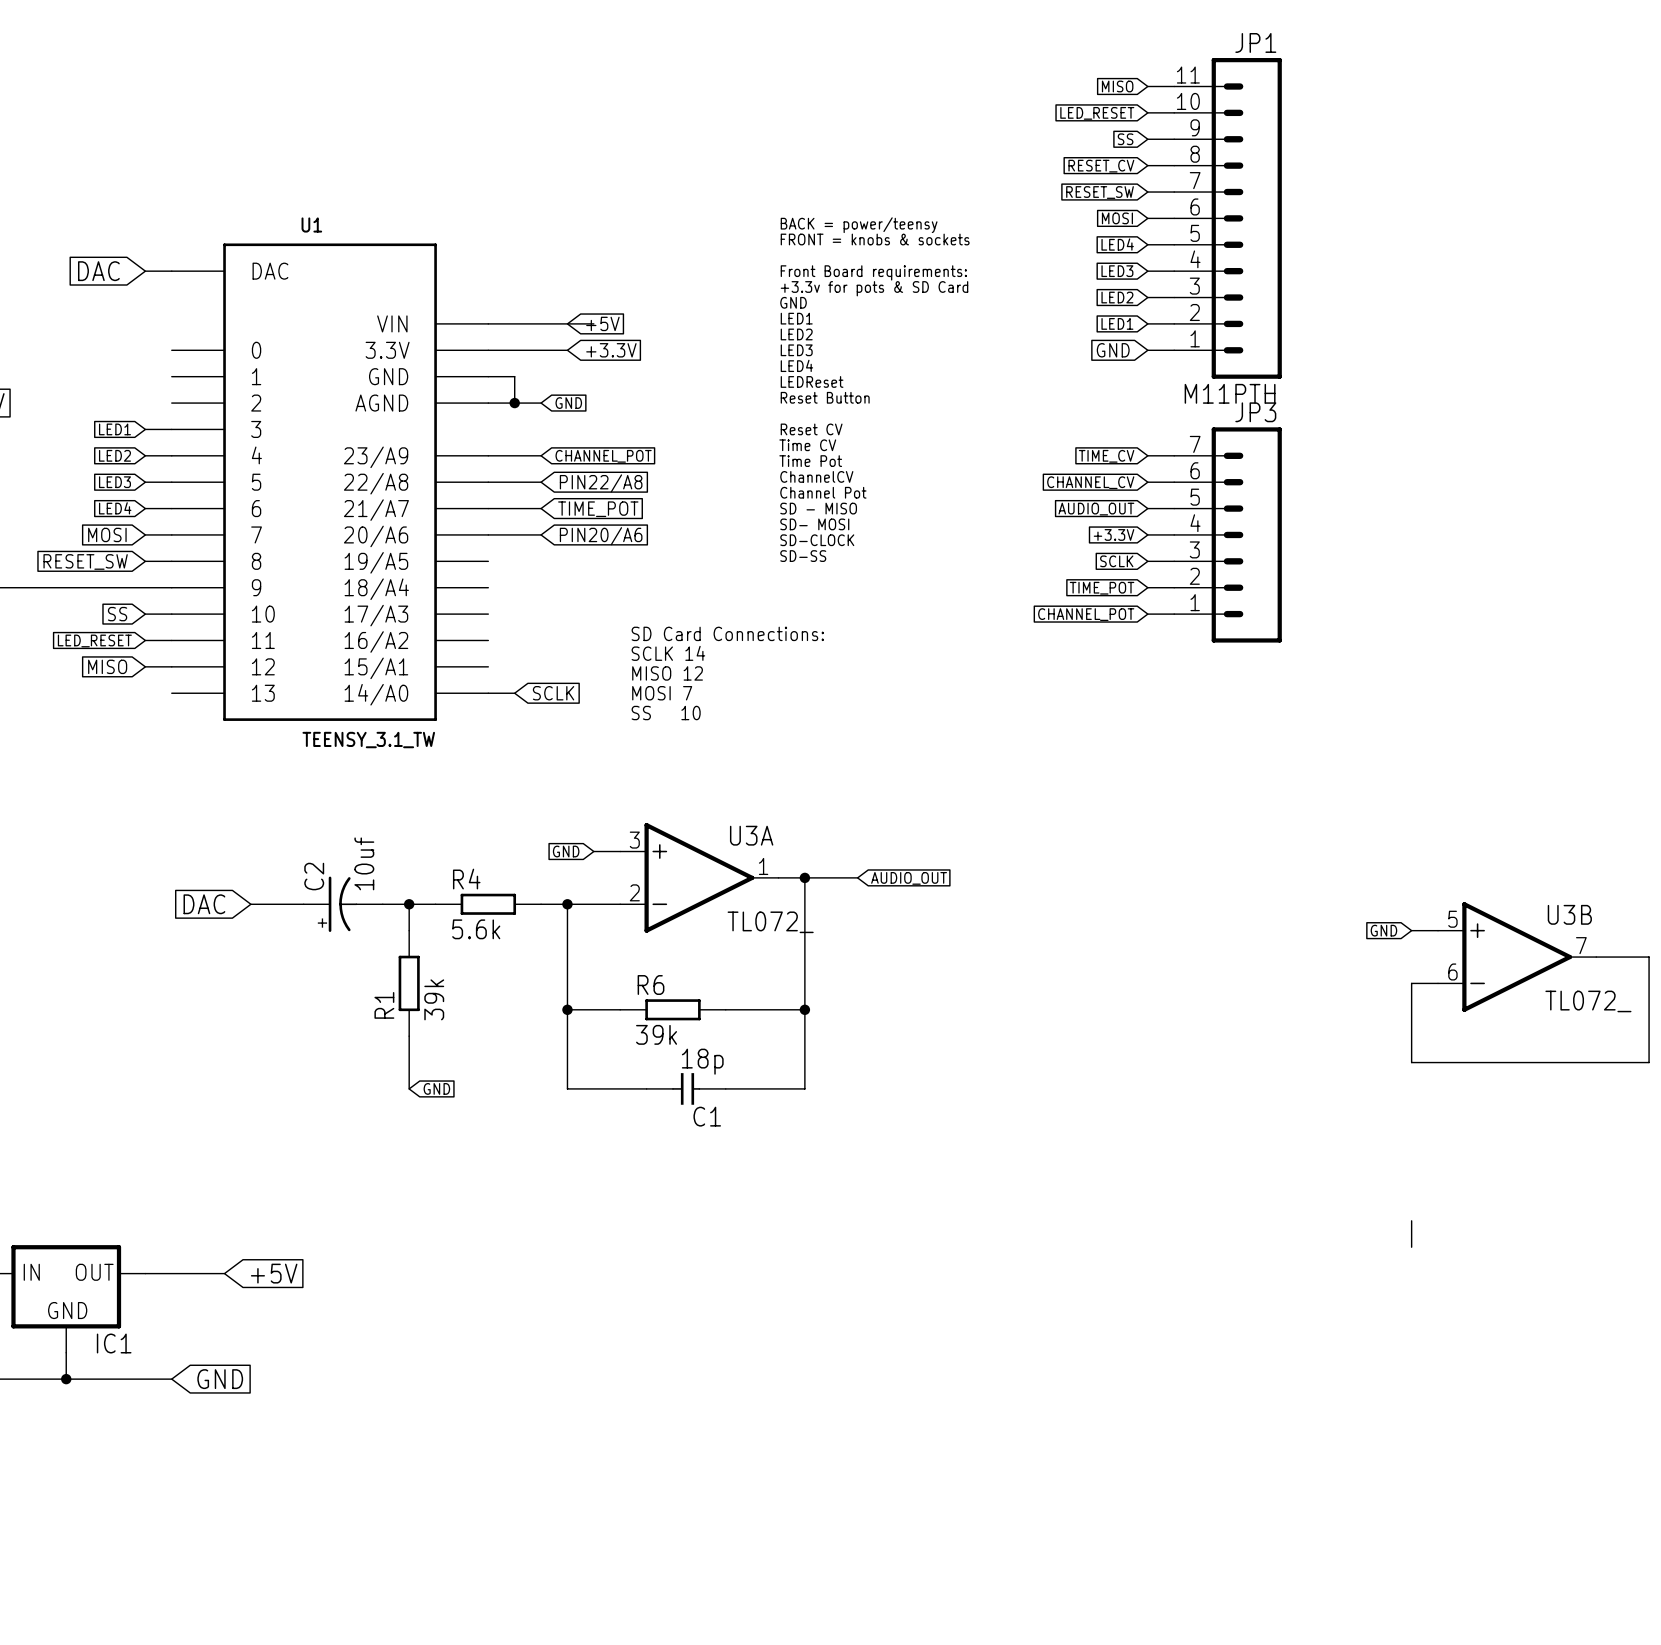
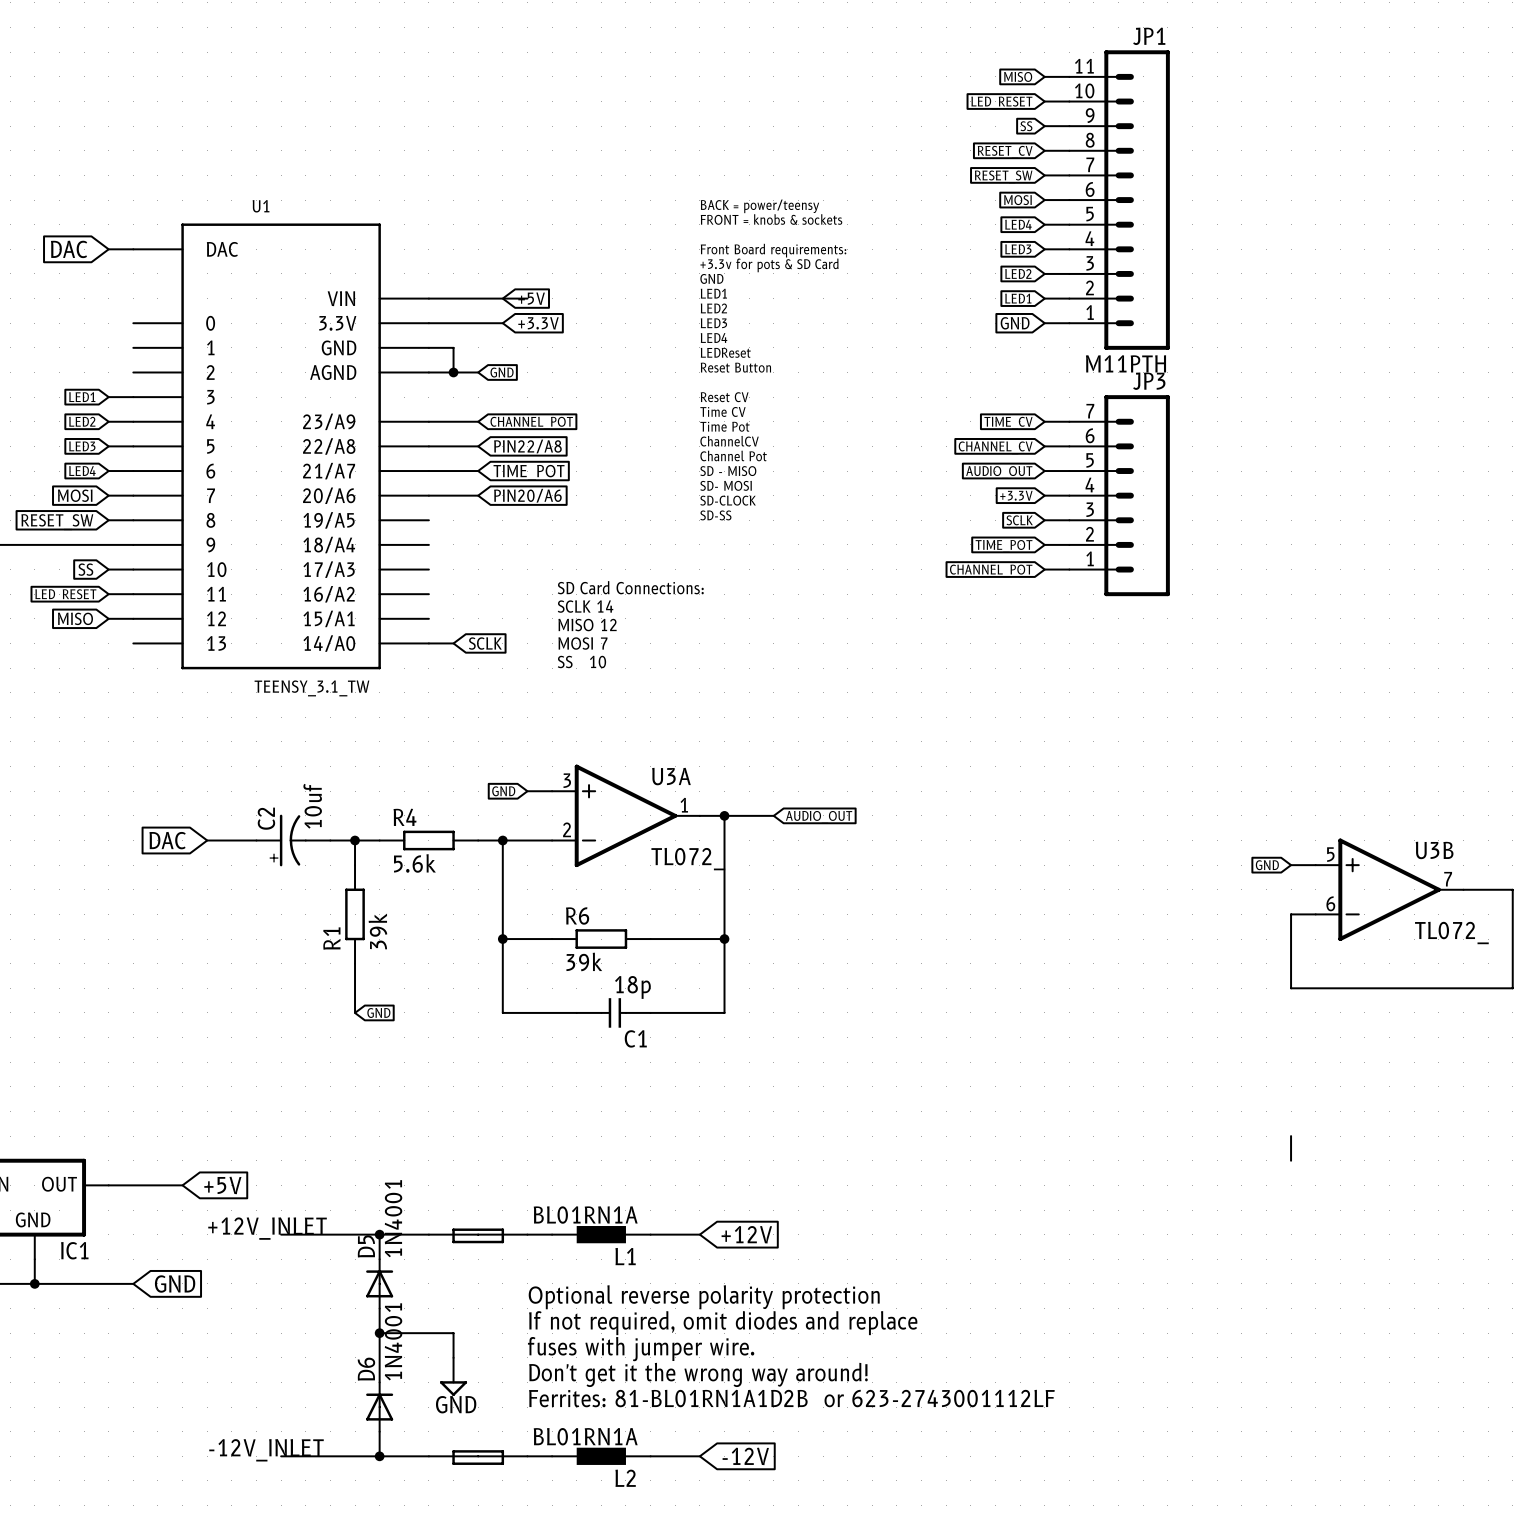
label: none -> +12V_INLET (267, 1228)
wire: none -> (281, 1234) (428, 1234)
wire: none -> (379, 1234) (379, 1259)
junction: none -> (379, 1234)
wire: none -> (527, 1234) (552, 1234)
L1: none -> BL01RN1A (601, 1234)
wire: none -> (650, 1234) (699, 1234)
global label: none -> +12V (746, 1234)
part: none -> (478, 1235)
D5: none -> 1N4001 (379, 1283)
text: none -> Optional reverse polarity protection (704, 1297)
wire: none -> (379, 1308) (379, 1382)
text: none -> If not required, omit diodes and replace (723, 1323)
wire: none -> (379, 1333) (453, 1333) (453, 1357)
junction: none -> (379, 1333)
text: none -> fuses with jumper wire. (641, 1349)
text: none -> Don't get it the wrong way around! (698, 1374)
power symbol: none -> GND (453, 1376)
text: none -> Ferrites: 81-BL01RN1A1D2B or 623-2743001112LF (791, 1398)
D6: none -> 1N4001 (379, 1407)
wire: none -> (379, 1431) (379, 1456)
label: none -> -12V_INLET (266, 1450)
wire: none -> (281, 1456) (428, 1456)
junction: none -> (379, 1456)
wire: none -> (527, 1456) (552, 1456)
L2: none -> BL01RN1A (601, 1456)
wire: none -> (650, 1456) (699, 1456)
global label: none -> -12V (745, 1456)
part: none -> (478, 1457)

